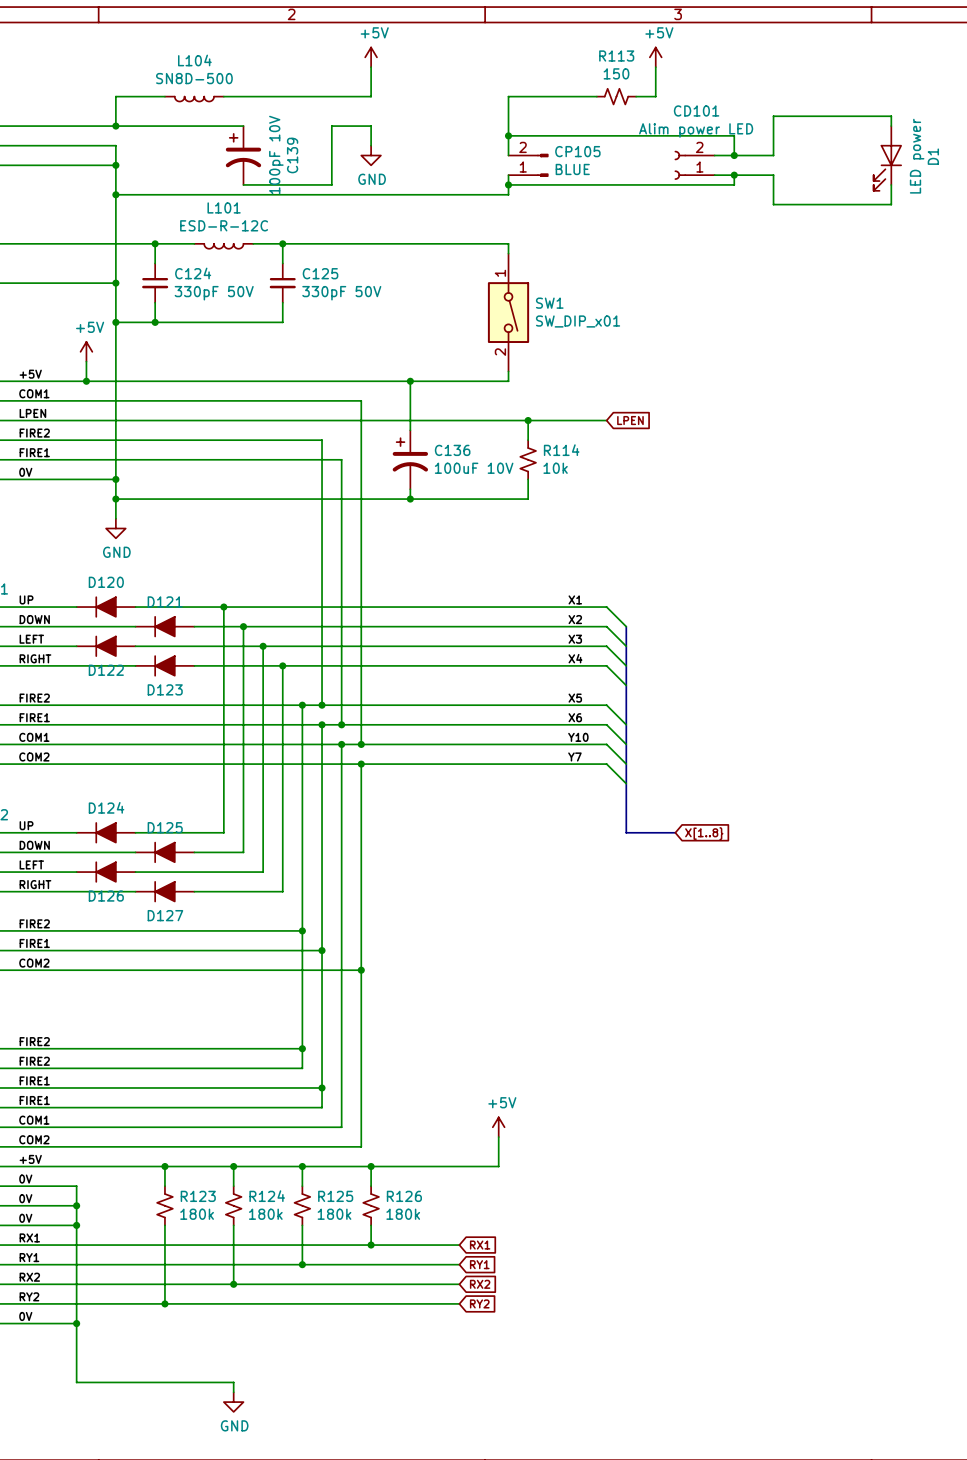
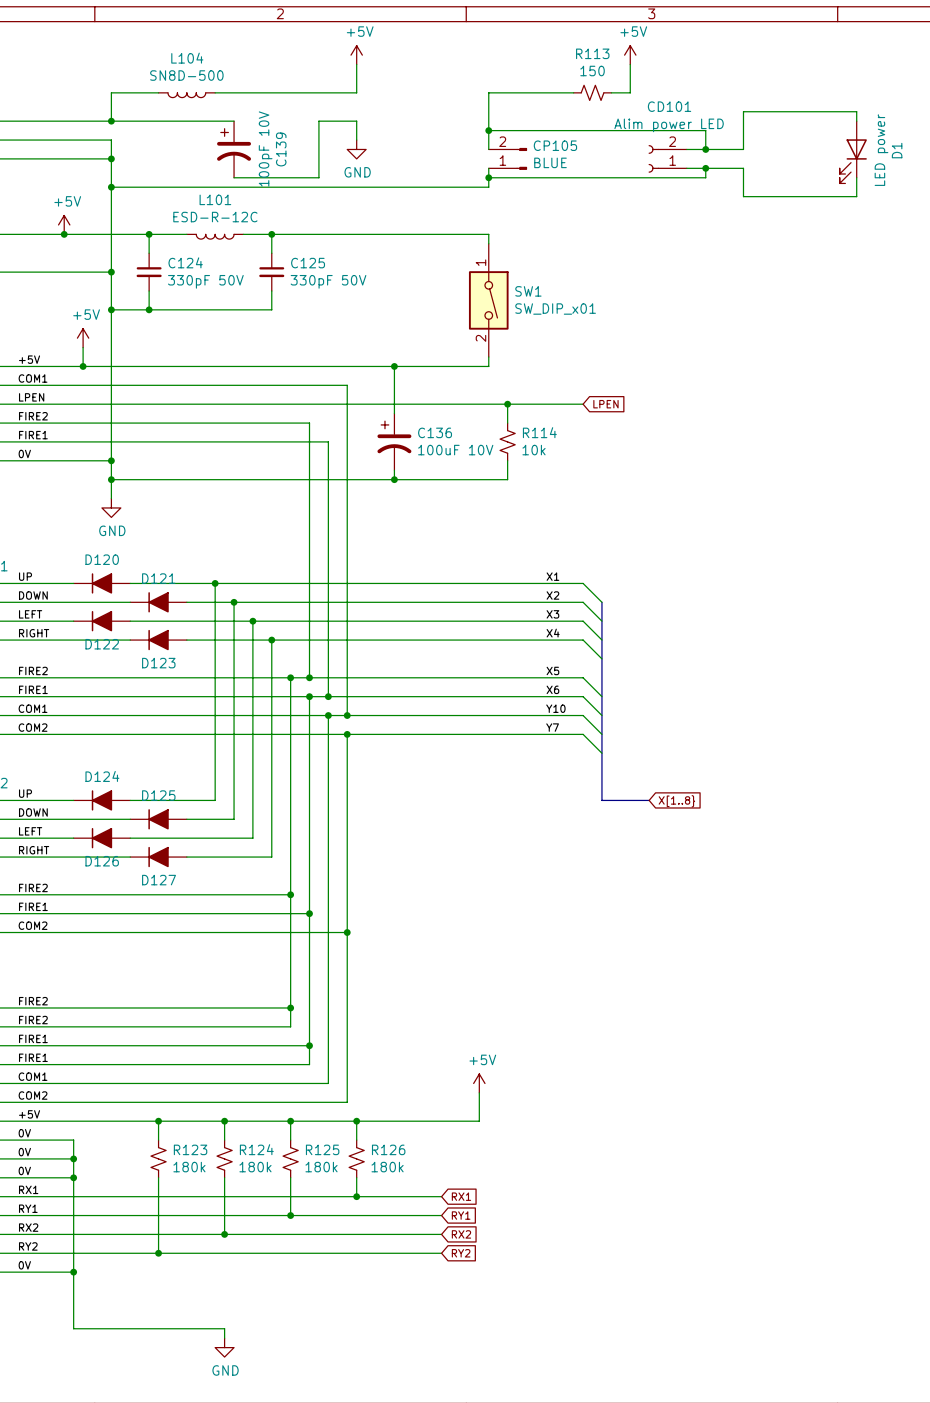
power symbol: none -> +5V (64, 224)
junction: none -> (64, 234)

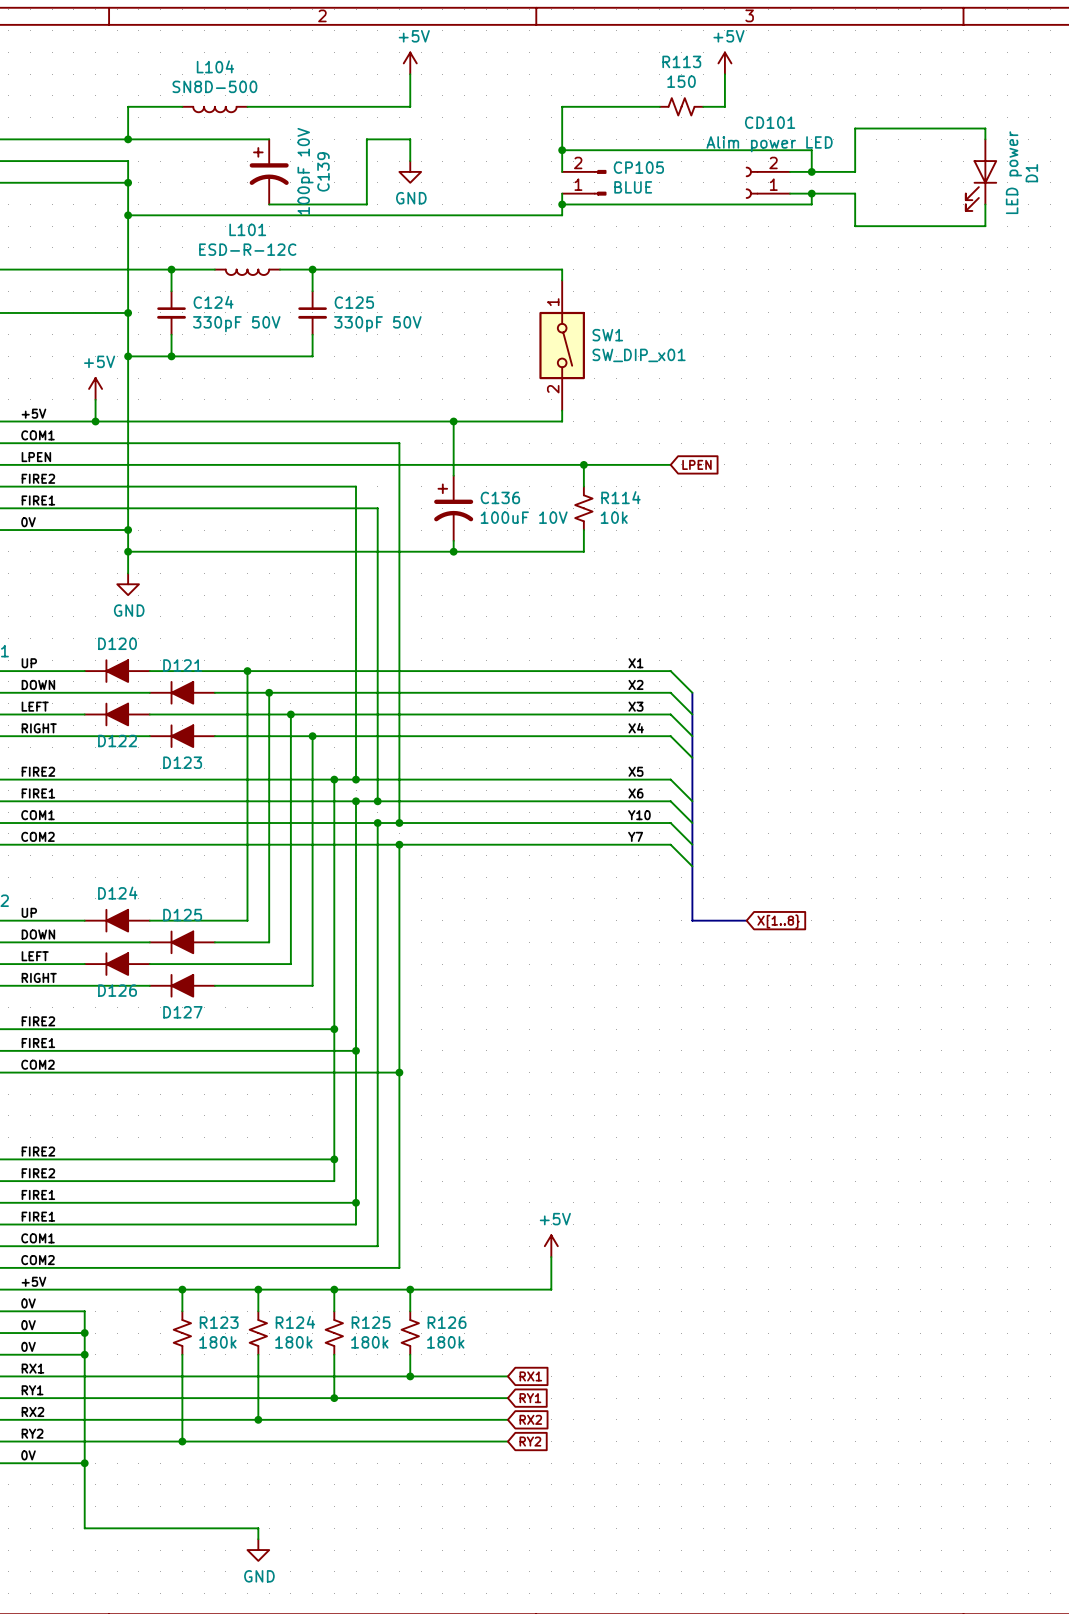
power symbol: +5V (64, 224) -> none
junction: (64, 234) -> none

